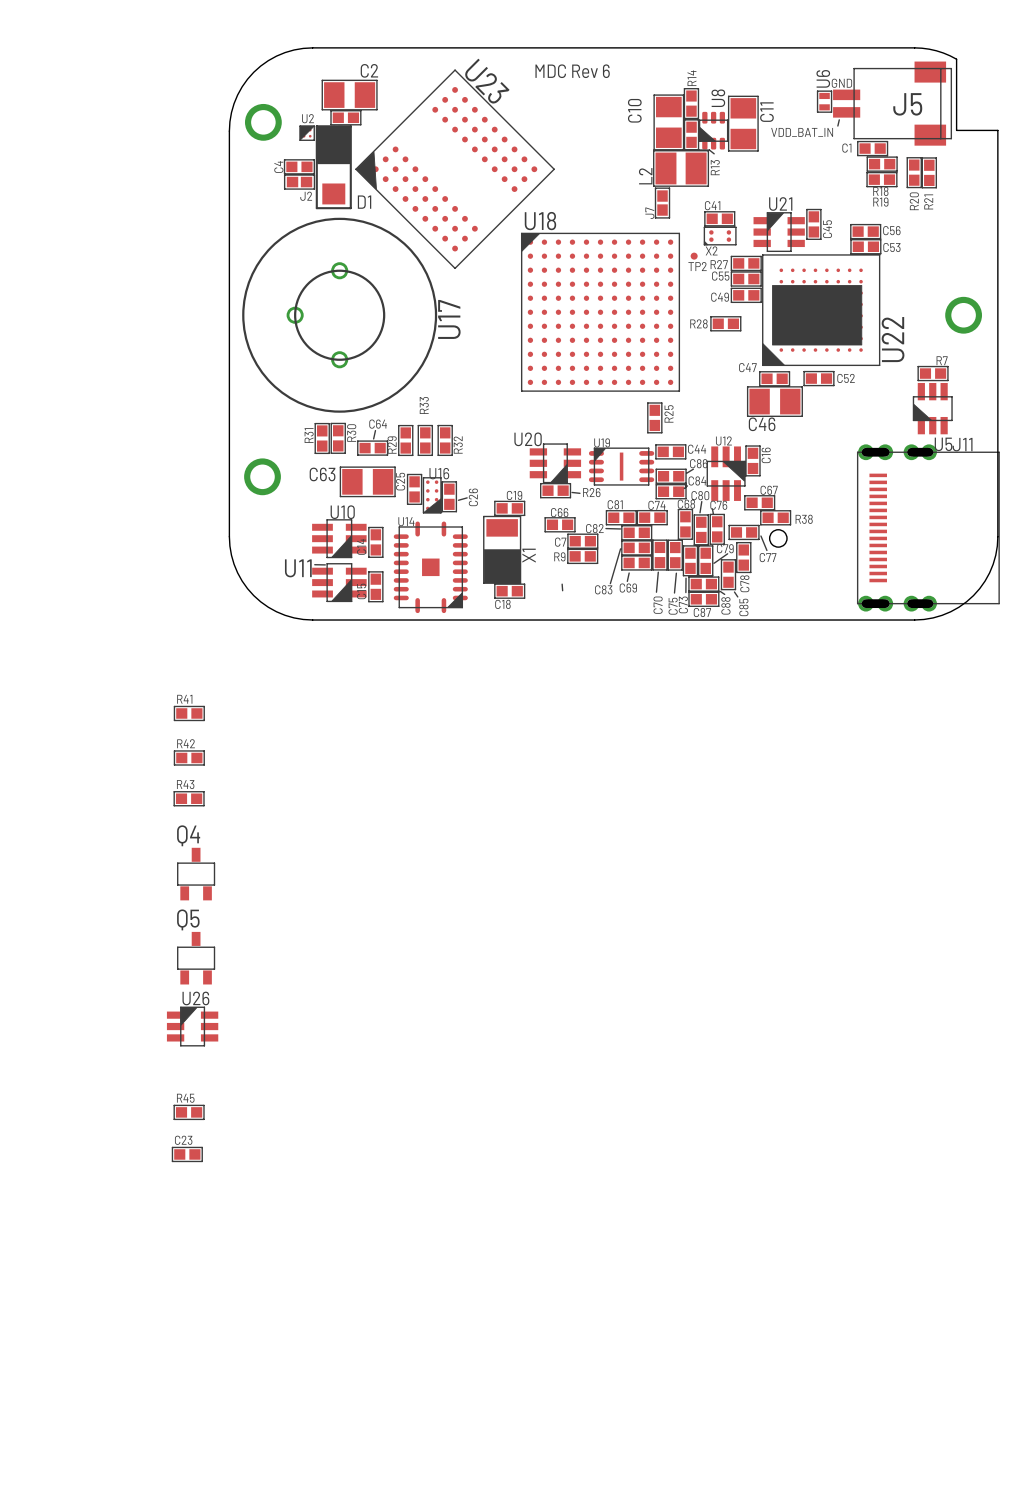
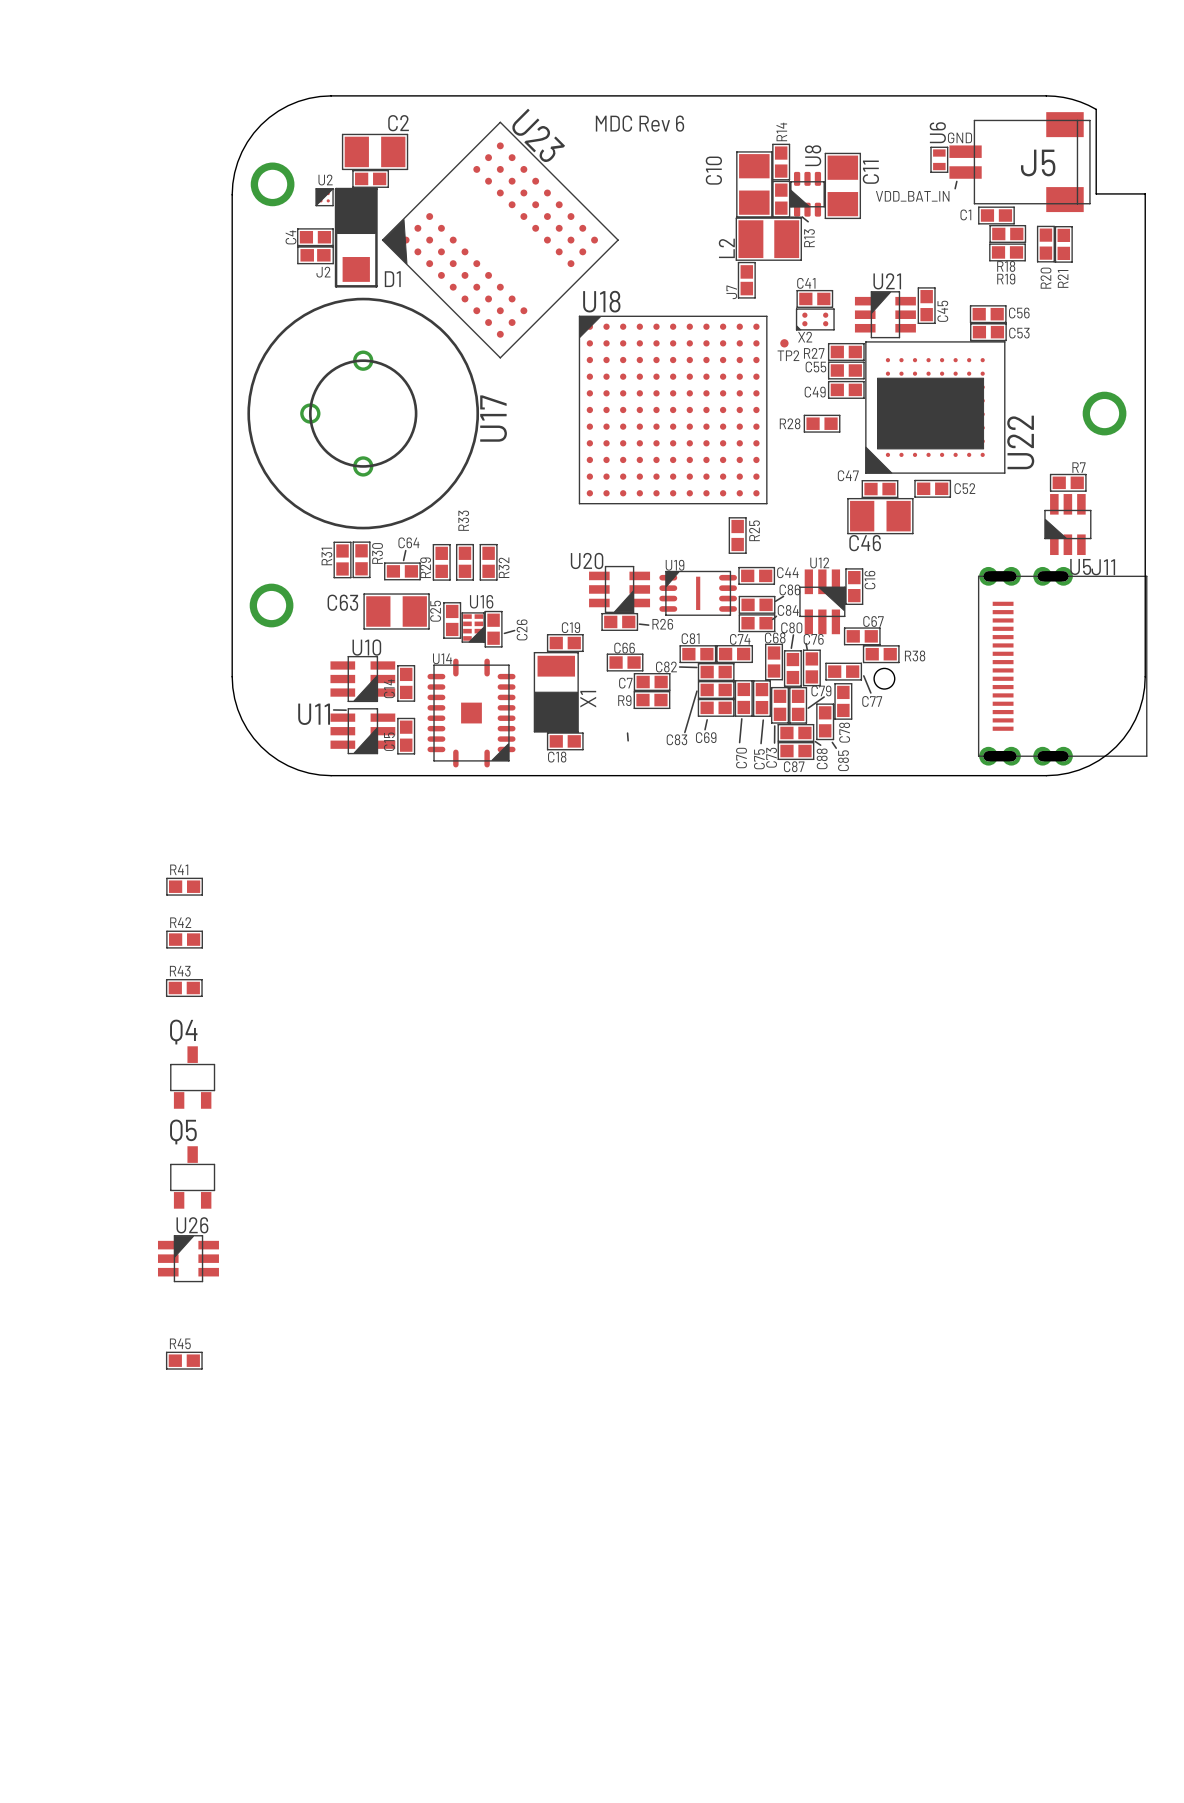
U16 footprint: [423, 477, 442, 514] -> [461, 612, 485, 643]
C23: (187, 1154) -> none

